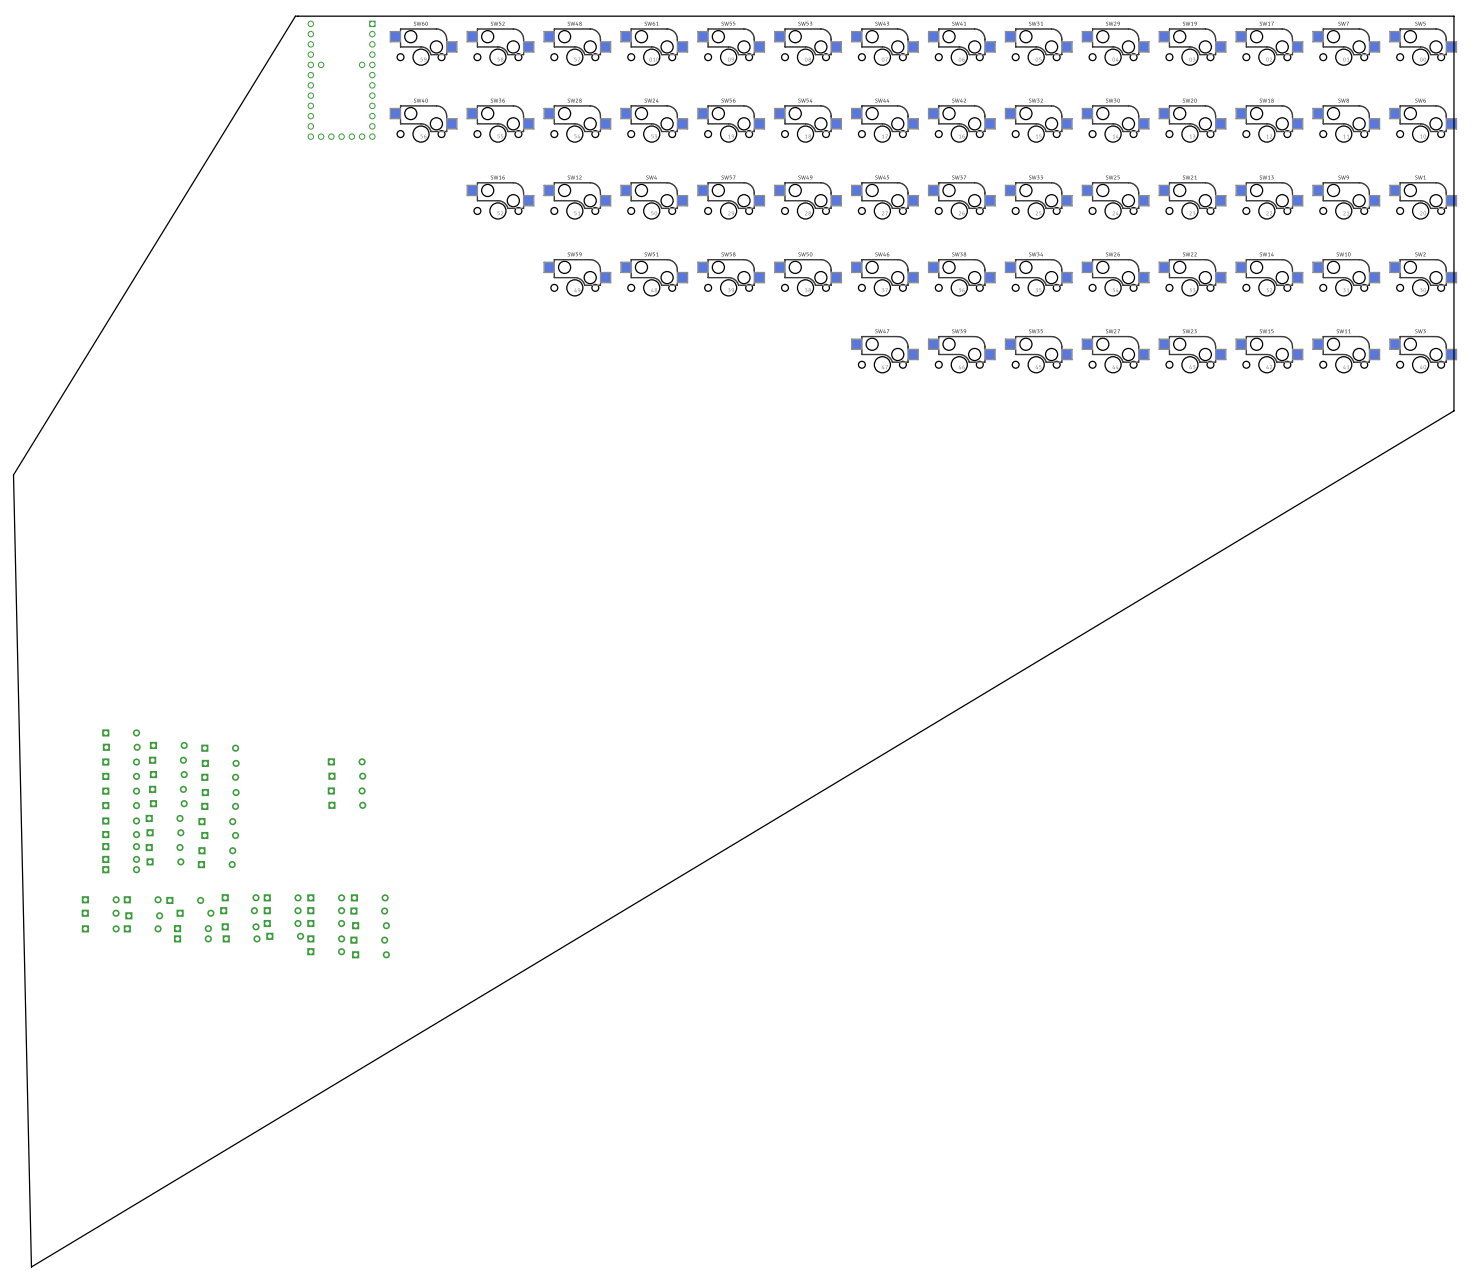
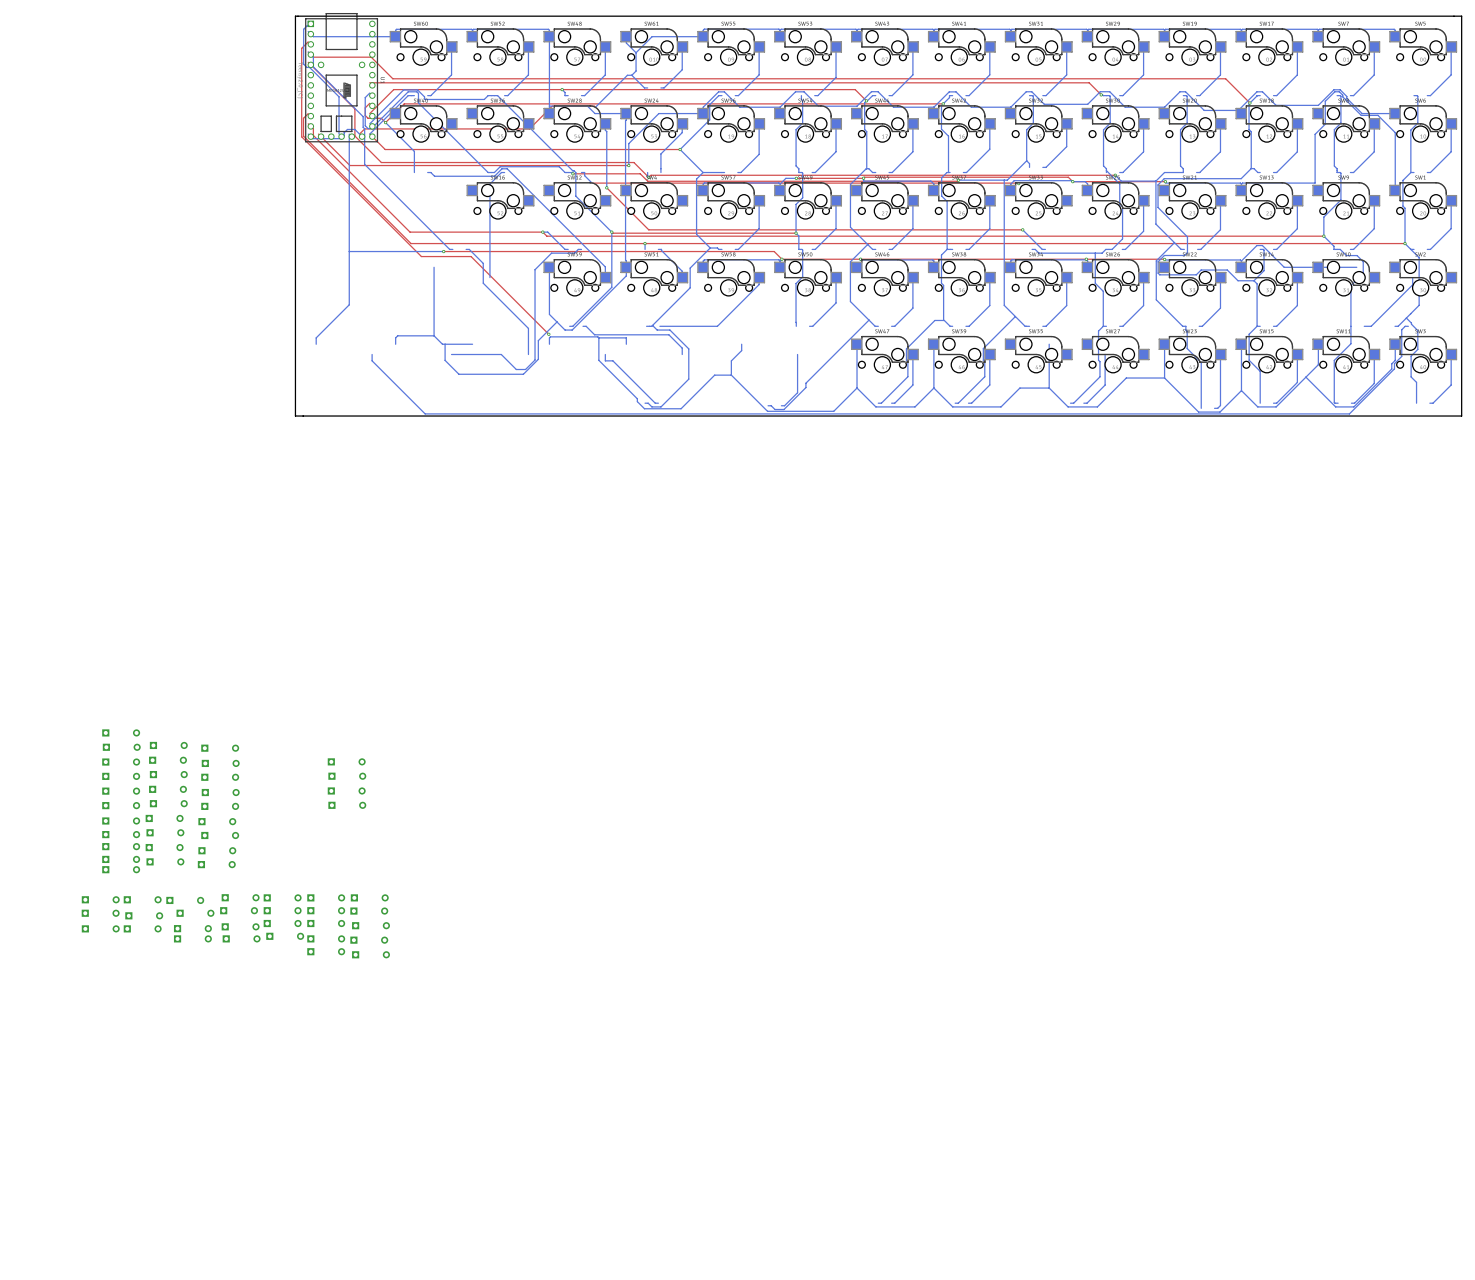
board edge: (1453, 16) (1453, 410) (31, 1266) (13, 474) (295, 16) -> (1453, 16) (1461, 16) (1461, 416) (295, 416) (295, 16)
bottom track: none -> (308, 21) (308, 25) (303, 29) (303, 64) (309, 67) (339, 96) (339, 134)
bottom track: none -> (472, 30) (549, 30) (549, 113)
bottom track: none -> (472, 30) (396, 29) (395, 36) (313, 36) (308, 31)
bottom track: none -> (780, 30) (704, 29) (703, 36) (652, 36) (636, 52)
bottom track: none -> (857, 30) (780, 30)
bottom track: none -> (933, 30) (857, 30)
bottom track: none -> (1010, 30) (933, 30)
bottom track: none -> (1087, 30) (1010, 30)
bottom track: none -> (1164, 30) (1087, 30)
bottom track: none -> (1241, 30) (1164, 30)
bottom track: none -> (1318, 30) (1394, 29) (1395, 36)
bottom track: none -> (1318, 30) (1241, 30)
bottom track: none -> (626, 36) (626, 43) (636, 52)
top track: none -> (308, 41) (301, 48) (301, 136) (421, 256) (471, 256) (548, 334)
bottom track: none -> (451, 46) (451, 74) (430, 95) (427, 95)
bottom track: none -> (528, 46) (528, 74) (507, 95) (504, 95)
bottom track: none -> (605, 46) (605, 74) (584, 95) (581, 95)
bottom track: none -> (682, 46) (682, 69) (664, 87) (660, 87)
bottom track: none -> (759, 46) (759, 74) (738, 95) (735, 95)
bottom track: none -> (836, 46) (836, 77) (817, 95) (814, 95)
bottom track: none -> (912, 46) (912, 74) (892, 95) (889, 95)
bottom track: none -> (989, 46) (989, 74) (969, 95) (965, 95)
bottom track: none -> (1066, 46) (1066, 74) (1045, 95) (1042, 95)
bottom track: none -> (1143, 46) (1143, 74) (1122, 95) (1119, 95)
bottom track: none -> (1220, 46) (1220, 74) (1199, 95) (1196, 95)
bottom track: none -> (1297, 46) (1297, 74) (1276, 95) (1273, 95)
bottom track: none -> (1374, 46) (1374, 74) (1353, 95) (1350, 95)
bottom track: none -> (1451, 46) (1451, 74) (1430, 95) (1427, 95)
bottom track: none -> (308, 52) (313, 57) (313, 66) (363, 116) (364, 164) (449, 249) (452, 249)
top track: none -> (308, 52) (313, 57) (371, 57) (392, 78) (1225, 78) (1249, 103)
bottom track: none -> (636, 52) (636, 71) (631, 75)
top track: none -> (308, 62) (354, 108) (354, 136) (381, 162) (633, 162) (648, 177) (651, 175) (1115, 175)
bottom track: none -> (631, 75) (627, 75) (595, 107)
bottom track: none -> (631, 75) (644, 87) (647, 87)
part side: top (341, 80) -> bottom (341, 77)
top track: none -> (369, 82) (1089, 82) (1101, 94)
bottom track: none -> (562, 89) (565, 95) (568, 95)
via: none -> (562, 89)
bottom track: none -> (369, 93) (365, 97) (365, 125) (368, 128) (371, 128) (408, 91) (416, 91) (418, 102) (488, 172) (494, 172) (500, 166) (559, 166) (565, 172) (572, 173)
bottom track: none -> (1101, 94) (1110, 96) (1110, 123) (1103, 129) (1103, 165) (1106, 172)
via: none -> (1101, 94)
bottom track: none -> (414, 95) (408, 95) (369, 134)
bottom track: none -> (721, 95) (718, 95) (709, 104) (709, 119) (680, 149) (703, 172)
bottom track: none -> (801, 95) (802, 123) (796, 129) (796, 166) (798, 172) (802, 173) (802, 197) (796, 204) (796, 233) (798, 235) (798, 249) (802, 250) (802, 276) (796, 283) (796, 326)
bottom track: none -> (875, 95) (872, 95) (864, 102) (866, 168)
bottom track: none -> (952, 95) (949, 95) (941, 105) (941, 129) (948, 136) (948, 172)
bottom track: none -> (1029, 95) (1033, 96) (1033, 123) (1026, 129) (1026, 160)
bottom track: none -> (1183, 95) (1187, 96) (1187, 123) (1180, 129) (1180, 166) (1183, 172) (1164, 172) (1155, 181)
bottom track: none -> (1260, 95) (1257, 95) (1249, 103) (1251, 168)
bottom track: none -> (1337, 95) (1340, 96) (1340, 123) (1334, 129) (1334, 166) (1337, 172) (1340, 173) (1340, 200) (1323, 217) (1323, 236) (1333, 246) (1333, 249) (1340, 249) (1346, 255) (1357, 255) (1363, 261) (1363, 273) (1350, 285) (1350, 343) (1334, 360) (1334, 402) (1338, 403)
bottom track: none -> (1413, 95) (1417, 96) (1417, 123) (1410, 130) (1410, 172)
top track: none -> (866, 100) (855, 89) (393, 89) (369, 113)
via: none -> (866, 100)
top track: none -> (369, 103) (365, 107) (365, 115) (368, 118) (381, 118) (385, 122) (404, 103) (943, 103)
via: none -> (943, 103)
via: none -> (1249, 103)
bottom track: none -> (549, 106) (587, 106) (594, 113) (626, 113) (626, 275) (572, 330) (565, 330) (549, 314) (549, 267)
top track: none -> (595, 107) (552, 106) (529, 128) (364, 128) (359, 134)
bottom track: none -> (780, 107) (739, 107) (724, 91) (718, 91) (703, 107) (703, 113) (658, 113) (628, 143) (628, 165)
bottom track: none -> (933, 107) (893, 107) (878, 91) (871, 91) (857, 106) (818, 106) (804, 91) (795, 91) (780, 107)
bottom track: none -> (1010, 107) (971, 107) (956, 91) (949, 91) (933, 107)
bottom track: none -> (1164, 107) (1180, 91) (1185, 91) (1204, 110) (1238, 110)
bottom track: none -> (1164, 107) (1125, 107) (1109, 91) (1100, 91) (1087, 104) (1044, 104) (1031, 91) (1026, 91) (1010, 107)
bottom track: none -> (1238, 110) (1256, 91) (1262, 91) (1276, 105) (1318, 105) (1333, 89) (1340, 89) (1362, 113) (1395, 113)
top track: none -> (308, 113) (303, 118) (303, 136) (411, 243) (1405, 243)
bottom track: none -> (385, 122) (414, 151) (414, 172)
via: none -> (385, 122)
top track: none -> (308, 123) (313, 128) (313, 135) (410, 232) (542, 232) (546, 236) (1323, 236)
bottom track: none -> (369, 123) (403, 89) (417, 89) (425, 99) (484, 99) (488, 95) (497, 95) (575, 172) (575, 196) (611, 232) (611, 287) (572, 326) (569, 326)
bottom track: none -> (605, 123) (606, 187)
bottom track: none -> (682, 123) (682, 132) (660, 153) (660, 172)
bottom track: none -> (759, 123) (759, 154) (740, 172) (737, 172)
bottom track: none -> (836, 123) (836, 151) (815, 172) (812, 172)
bottom track: none -> (912, 123) (912, 151) (892, 172) (889, 172)
bottom track: none -> (989, 123) (989, 149) (966, 172) (963, 172)
bottom track: none -> (1066, 123) (1066, 146) (1045, 167) (1042, 167)
bottom track: none -> (1143, 123) (1143, 151) (1122, 172) (1119, 172)
bottom track: none -> (1220, 123) (1220, 151) (1199, 172) (1196, 172)
bottom track: none -> (1297, 123) (1297, 151) (1276, 172) (1273, 172)
bottom track: none -> (1374, 123) (1374, 151) (1353, 172) (1350, 172)
bottom track: none -> (1451, 123) (1451, 151) (1430, 172) (1427, 172)
top track: none -> (318, 134) (349, 165) (628, 165)
bottom track: none -> (349, 134) (349, 304) (316, 337) (316, 344)
bottom track: none -> (359, 134) (354, 129) (347, 129) (340, 138) (312, 138) (308, 134)
top track: none -> (369, 134) (385, 149) (680, 149)
via: none -> (680, 149)
bottom track: none -> (1026, 160) (1007, 180) (958, 180)
bottom track: none -> (1026, 160) (1029, 167)
via: none -> (628, 165)
bottom track: none -> (1251, 168) (1241, 178) (1164, 178) (1158, 184) (1158, 207) (1187, 236) (1187, 252) (1184, 255) (1164, 255) (1158, 261) (1158, 273) (1159, 274) (1196, 274) (1201, 270) (1227, 270) (1238, 280) (1253, 280)
bottom track: none -> (1251, 168) (1260, 172)
bottom track: none -> (1106, 170) (1119, 183) (1119, 204) (1122, 207) (1122, 238) (1112, 249) (1105, 249) (1102, 253) (1038, 253) (1032, 249)
bottom track: none -> (427, 172) (434, 176) (494, 176) (501, 168) (507, 168) (605, 266) (605, 277)
bottom track: none -> (504, 172) (501, 172) (489, 184) (489, 277)
bottom track: none -> (581, 172) (584, 172) (584, 175) (592, 183)
bottom track: none -> (647, 172) (648, 177)
bottom track: none -> (703, 172) (696, 179) (696, 234) (710, 248)
bottom track: none -> (724, 172) (703, 172)
bottom track: none -> (875, 172) (866, 168) (850, 184) (850, 227) (872, 249) (875, 249)
bottom track: none -> (950, 172) (946, 172) (941, 177) (941, 196) (947, 201) (947, 249)
bottom track: none -> (1410, 172) (1402, 180) (1405, 243) (1419, 257) (1419, 305) (1406, 318)
bottom track: none -> (1413, 172) (1410, 172)
top track: none -> (572, 173) (640, 173) (647, 181) (958, 180)
via: none -> (572, 173)
bottom track: none -> (1115, 175) (1121, 181) (1155, 181)
via: none -> (1115, 175)
via: none -> (648, 177)
bottom track: none -> (796, 178) (785, 178) (780, 184) (704, 182) (703, 190)
top track: none -> (796, 178) (1068, 177) (1072, 181) (1165, 181)
via: none -> (796, 178)
bottom track: none -> (863, 178) (863, 181) (930, 181) (933, 184) (933, 190)
via: none -> (863, 178)
via: none -> (958, 180)
bottom track: none -> (1004, 180) (1004, 305) (1025, 326) (1029, 326)
via: none -> (1072, 181)
bottom track: none -> (1155, 181) (1155, 224) (1181, 249) (1184, 249)
via: none -> (1165, 181)
top track: none -> (592, 183) (1018, 183)
via: none -> (1018, 183)
bottom track: none -> (1165, 183) (1241, 184)
bottom track: none -> (1241, 184) (1315, 183) (1315, 134) (1325, 124) (1325, 101) (1334, 91) (1339, 91) (1361, 115) (1378, 115) (1395, 132) (1395, 190)
top track: none -> (606, 187) (648, 229) (1022, 229)
via: none -> (606, 187)
bottom track: none -> (1087, 190) (1087, 184) (1085, 181) (1071, 180) (1014, 180) (1010, 184) (1010, 190)
bottom track: none -> (759, 200) (759, 228) (738, 249) (735, 249)
bottom track: none -> (836, 200) (836, 228) (815, 249) (812, 249)
bottom track: none -> (912, 200) (912, 228) (892, 249) (889, 249)
bottom track: none -> (989, 200) (989, 228) (969, 249) (965, 249)
bottom track: none -> (1143, 200) (1143, 231) (1125, 249) (1122, 249)
bottom track: none -> (1220, 200) (1220, 229) (1200, 249) (1197, 249)
bottom track: none -> (1297, 200) (1297, 228) (1276, 249) (1273, 249)
bottom track: none -> (1374, 200) (1374, 228) (1353, 249) (1350, 249)
bottom track: none -> (1451, 200) (1451, 228) (1430, 249) (1427, 249)
bottom track: none -> (1022, 229) (1042, 249) (1045, 249)
via: none -> (1022, 229)
bottom track: none -> (542, 232) (547, 232) (565, 249) (568, 249)
via: none -> (542, 232)
top track: none -> (611, 232) (796, 233)
via: none -> (611, 232)
via: none -> (796, 233)
via: none -> (1323, 236)
bottom track: none -> (1174, 242) (1156, 260) (1156, 299) (1182, 326) (1185, 326) (1187, 348) (1201, 362) (1201, 408)
bottom track: none -> (644, 243) (645, 249)
via: none -> (644, 243)
via: none -> (1405, 243)
bottom track: none -> (867, 244) (850, 261) (850, 301) (875, 326) (878, 326)
bottom track: none -> (710, 248) (690, 268) (690, 287) (652, 325)
bottom track: none -> (710, 248) (721, 249)
bottom track: none -> (466, 249) (469, 249) (483, 263) (483, 283) (528, 328) (528, 354)
bottom track: none -> (581, 249) (574, 253) (551, 253) (535, 269) (535, 360) (525, 369) (516, 369) (501, 354) (451, 354)
bottom track: none -> (658, 249) (661, 249) (682, 271) (682, 277)
bottom track: none -> (947, 249) (941, 255) (943, 320)
bottom track: none -> (952, 249) (947, 249)
bottom track: none -> (1260, 249) (1264, 250) (1264, 270) (1253, 280)
bottom track: none -> (1413, 249) (1410, 249)
bottom track: none -> (443, 251) (349, 251)
top track: none -> (443, 251) (774, 251) (781, 259) (1164, 259)
via: none -> (443, 251)
bottom track: none -> (1095, 253) (1095, 283) (1103, 291) (1103, 326)
via: none -> (781, 259)
bottom track: none -> (860, 259) (932, 259) (933, 267)
via: none -> (860, 259)
via: none -> (1086, 259)
bottom track: none -> (1164, 259) (1241, 261)
via: none -> (1164, 259)
bottom track: none -> (1241, 261) (1256, 245) (1262, 245) (1284, 267) (1356, 267)
bottom track: none -> (434, 267) (434, 335)
bottom track: none -> (780, 267) (778, 259) (704, 259) (703, 267)
bottom track: none -> (1087, 267) (1086, 259) (1011, 259) (1010, 267)
bottom track: none -> (759, 277) (759, 284) (717, 326) (659, 326)
bottom track: none -> (836, 277) (836, 303) (812, 326) (809, 326)
bottom track: none -> (912, 277) (912, 308) (894, 326) (891, 326)
bottom track: none -> (989, 277) (989, 305) (969, 326) (965, 326)
bottom track: none -> (1066, 277) (1066, 305) (1045, 326) (1042, 326)
bottom track: none -> (1143, 277) (1143, 305) (1122, 326) (1119, 326)
bottom track: none -> (1220, 277) (1220, 308) (1202, 326) (1199, 326)
bottom track: none -> (1297, 277) (1297, 305) (1276, 326) (1273, 326)
bottom track: none -> (1412, 277) (1412, 284) (1371, 326) (1364, 326)
bottom track: none -> (1253, 280) (1257, 283) (1257, 326)
bottom track: none -> (1015, 316) (983, 348) (984, 376) (958, 403) (955, 403)
bottom track: none -> (1406, 318) (1398, 326) (1395, 326)
bottom track: none -> (1406, 318) (1417, 330) (1417, 349) (1411, 356) (1411, 376) (1416, 382) (1416, 403)
bottom track: none -> (869, 320) (805, 383) (805, 387) (784, 409) (774, 409) (768, 405)
bottom track: none -> (556, 321) (538, 340) (538, 359) (523, 374) (458, 374) (445, 360) (445, 344)
bottom track: none -> (652, 325) (646, 326)
bottom track: none -> (652, 325) (657, 330) (669, 330) (688, 348) (688, 379) (661, 406) (651, 406) (645, 403)
bottom track: none -> (583, 326) (586, 326) (594, 334) (668, 334) (682, 348) (682, 354)
bottom track: none -> (952, 326) (944, 320) (934, 320) (906, 348) (907, 376) (881, 403) (878, 403)
bottom track: none -> (1103, 326) (1098, 331) (1099, 376) (1073, 403) (1070, 403)
bottom track: none -> (1106, 326) (1103, 326)
bottom track: none -> (1257, 326) (1249, 334) (1249, 360) (1260, 371) (1260, 403)
bottom track: none -> (1260, 326) (1257, 326)
bottom track: none -> (1408, 326) (1401, 329) (1401, 356) (1394, 363) (1394, 368) (1349, 413) (425, 413) (372, 360) (372, 354)
via: none -> (548, 334)
bottom track: none -> (434, 335) (442, 344) (472, 344)
bottom track: none -> (434, 335) (397, 335) (395, 337) (395, 344)
bottom track: none -> (598, 337) (598, 360) (637, 398) (637, 401) (644, 408) (681, 408) (714, 375) (731, 375)
bottom track: none -> (598, 337) (550, 336) (549, 344)
bottom track: none -> (598, 337) (626, 337) (626, 344)
bottom track: none -> (741, 344) (741, 350) (731, 360) (731, 375)
bottom track: none -> (857, 344) (857, 388)
bottom track: none -> (933, 344) (933, 388)
bottom track: none -> (1049, 344) (1049, 388)
bottom track: none -> (1164, 344) (1164, 378)
bottom track: none -> (1241, 344) (1241, 390)
bottom track: none -> (1318, 344) (1318, 364) (1305, 377)
bottom track: none -> (1395, 344) (1395, 360) (1391, 363) (1391, 369) (1353, 406) (1335, 406) (1305, 377)
bottom track: none -> (605, 354) (605, 360) (612, 360) (655, 403) (658, 403)
bottom track: none -> (797, 354) (797, 392) (784, 405) (781, 405)
bottom track: none -> (912, 354) (912, 385) (894, 403) (891, 403)
bottom track: none -> (989, 354) (989, 385) (971, 403) (968, 403)
bottom track: none -> (1105, 354) (1105, 385) (1086, 403) (1083, 403)
bottom track: none -> (1220, 354) (1220, 405) (1214, 408)
bottom track: none -> (1297, 354) (1297, 382) (1276, 403) (1273, 403)
bottom track: none -> (1374, 354) (1374, 383) (1354, 403) (1351, 403)
bottom track: none -> (1451, 354) (1451, 385) (1433, 403) (1429, 403)
bottom track: none -> (731, 375) (767, 411) (833, 411) (857, 388)
bottom track: none -> (1305, 377) (1276, 406) (1257, 406) (1241, 390)
bottom track: none -> (1164, 378) (1126, 378) (1097, 406) (1068, 406) (1049, 388)
bottom track: none -> (1164, 378) (1198, 412) (1220, 412) (1241, 390)
bottom track: none -> (933, 388) (915, 406) (875, 406) (857, 388)
bottom track: none -> (1049, 388) (1019, 388) (1001, 406) (952, 406) (933, 388)

